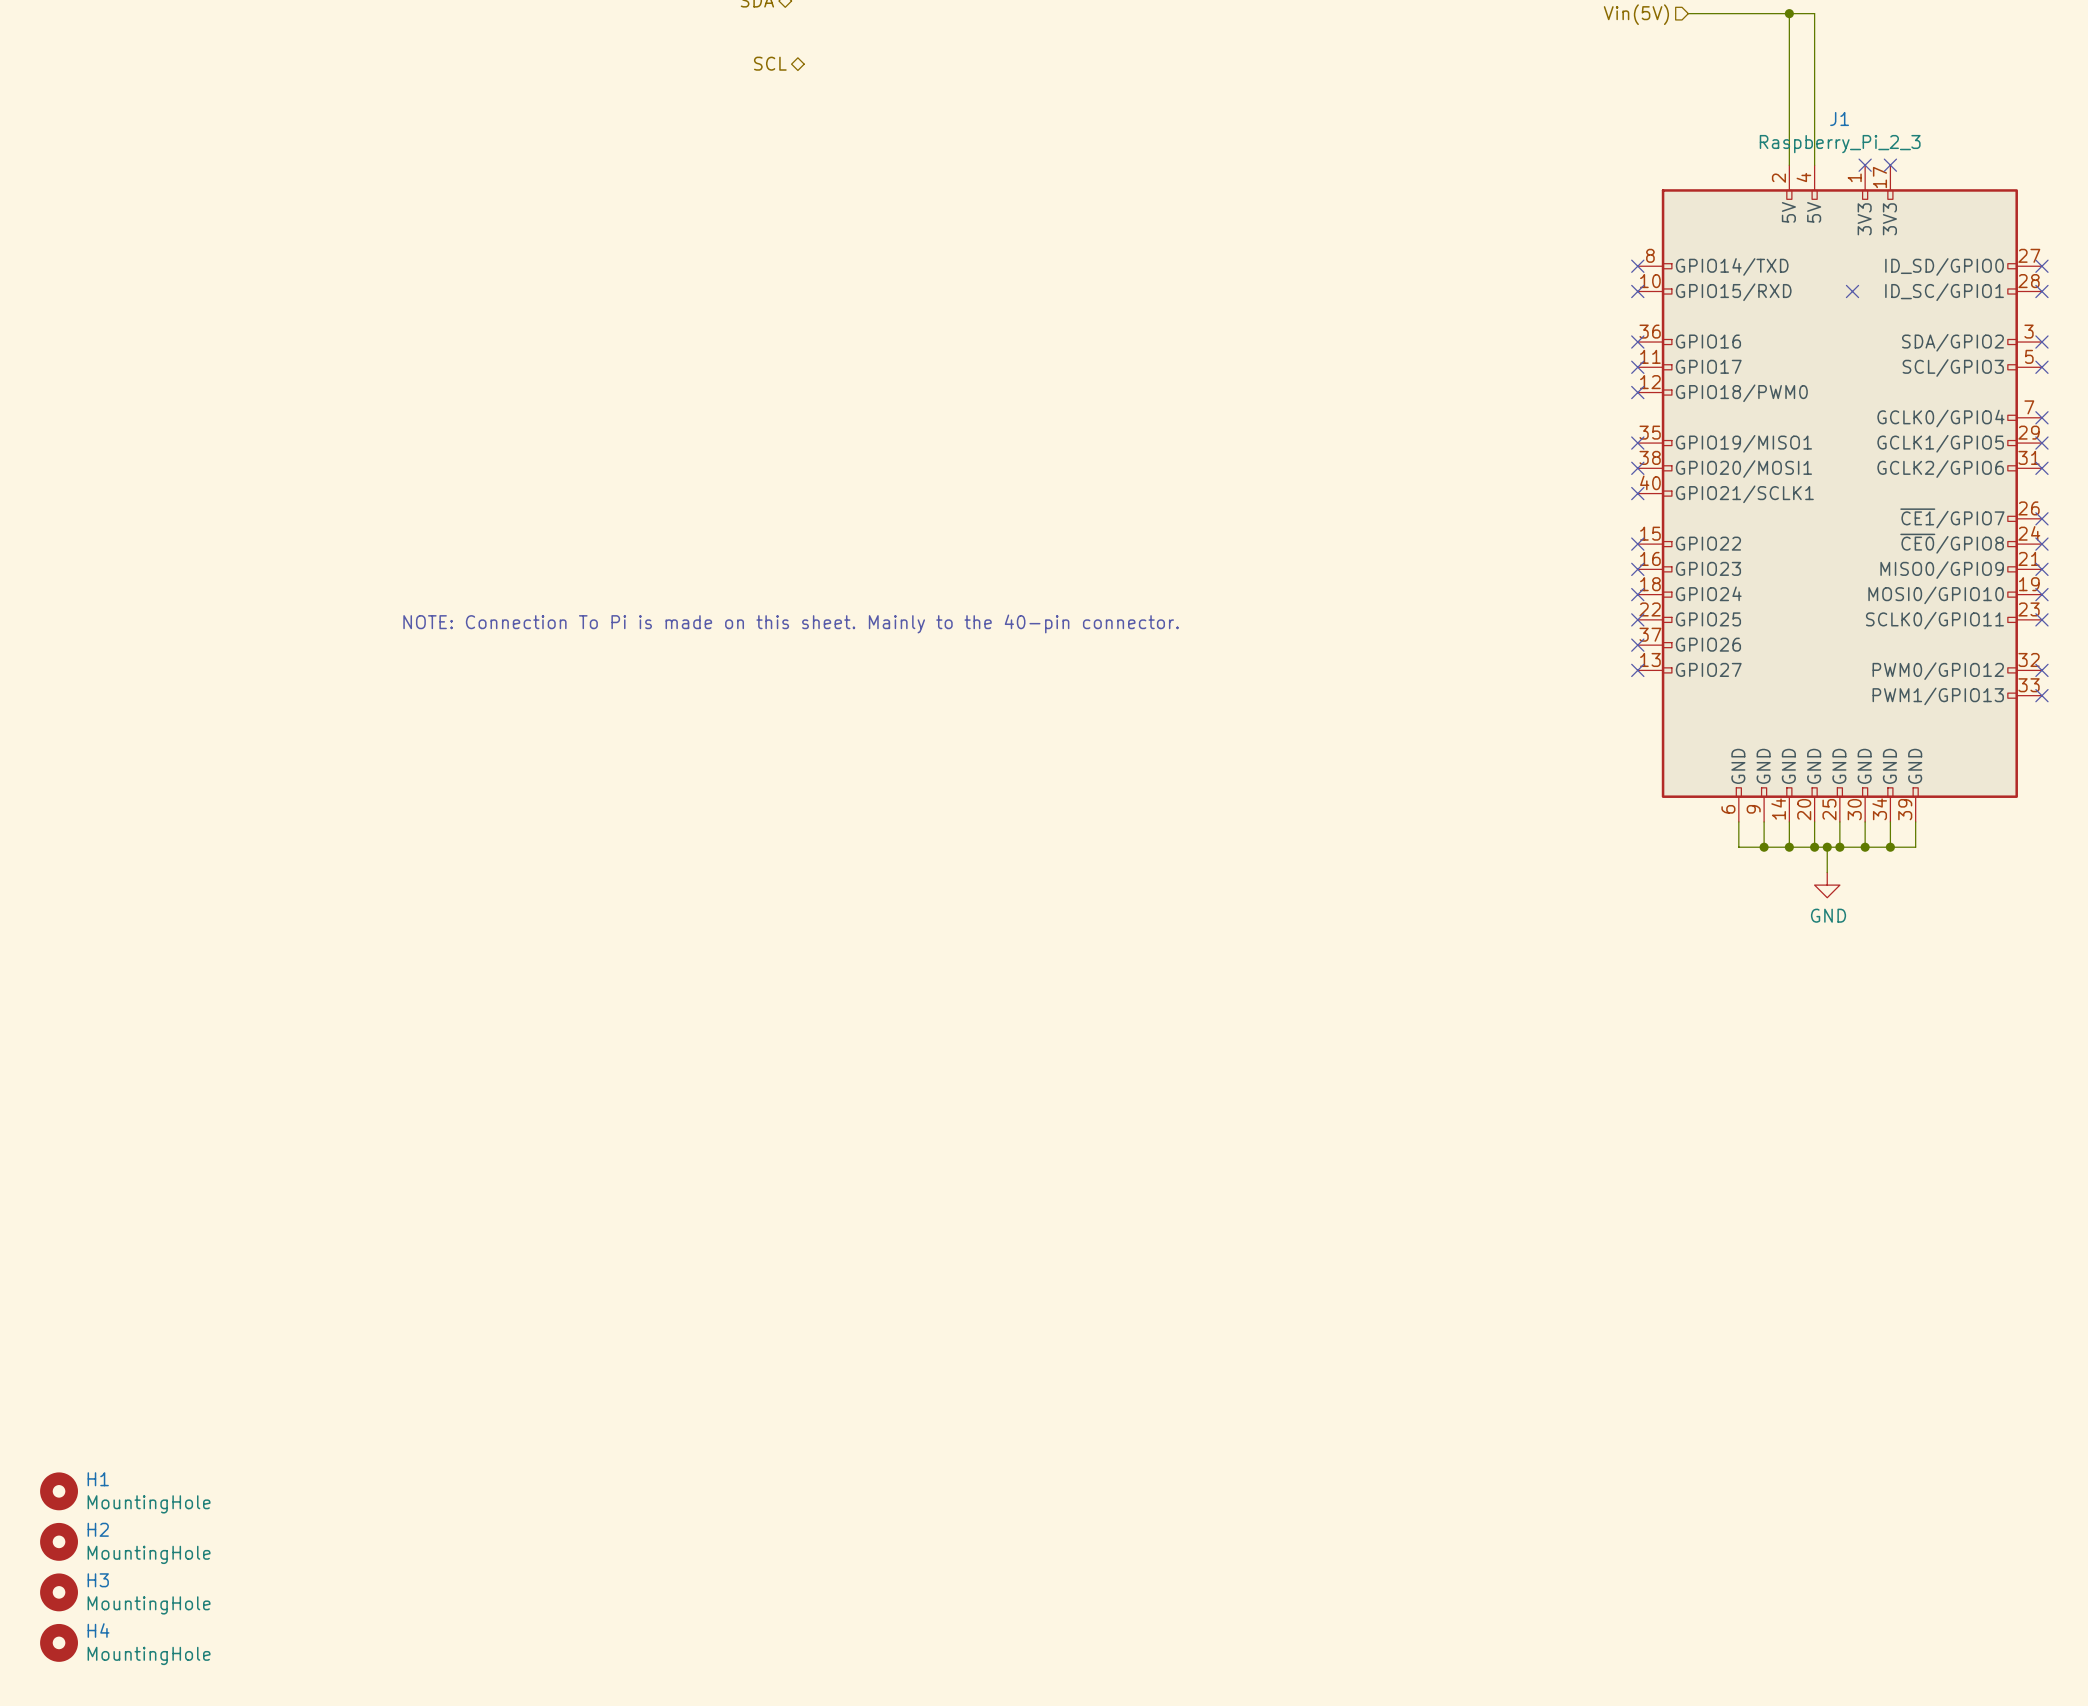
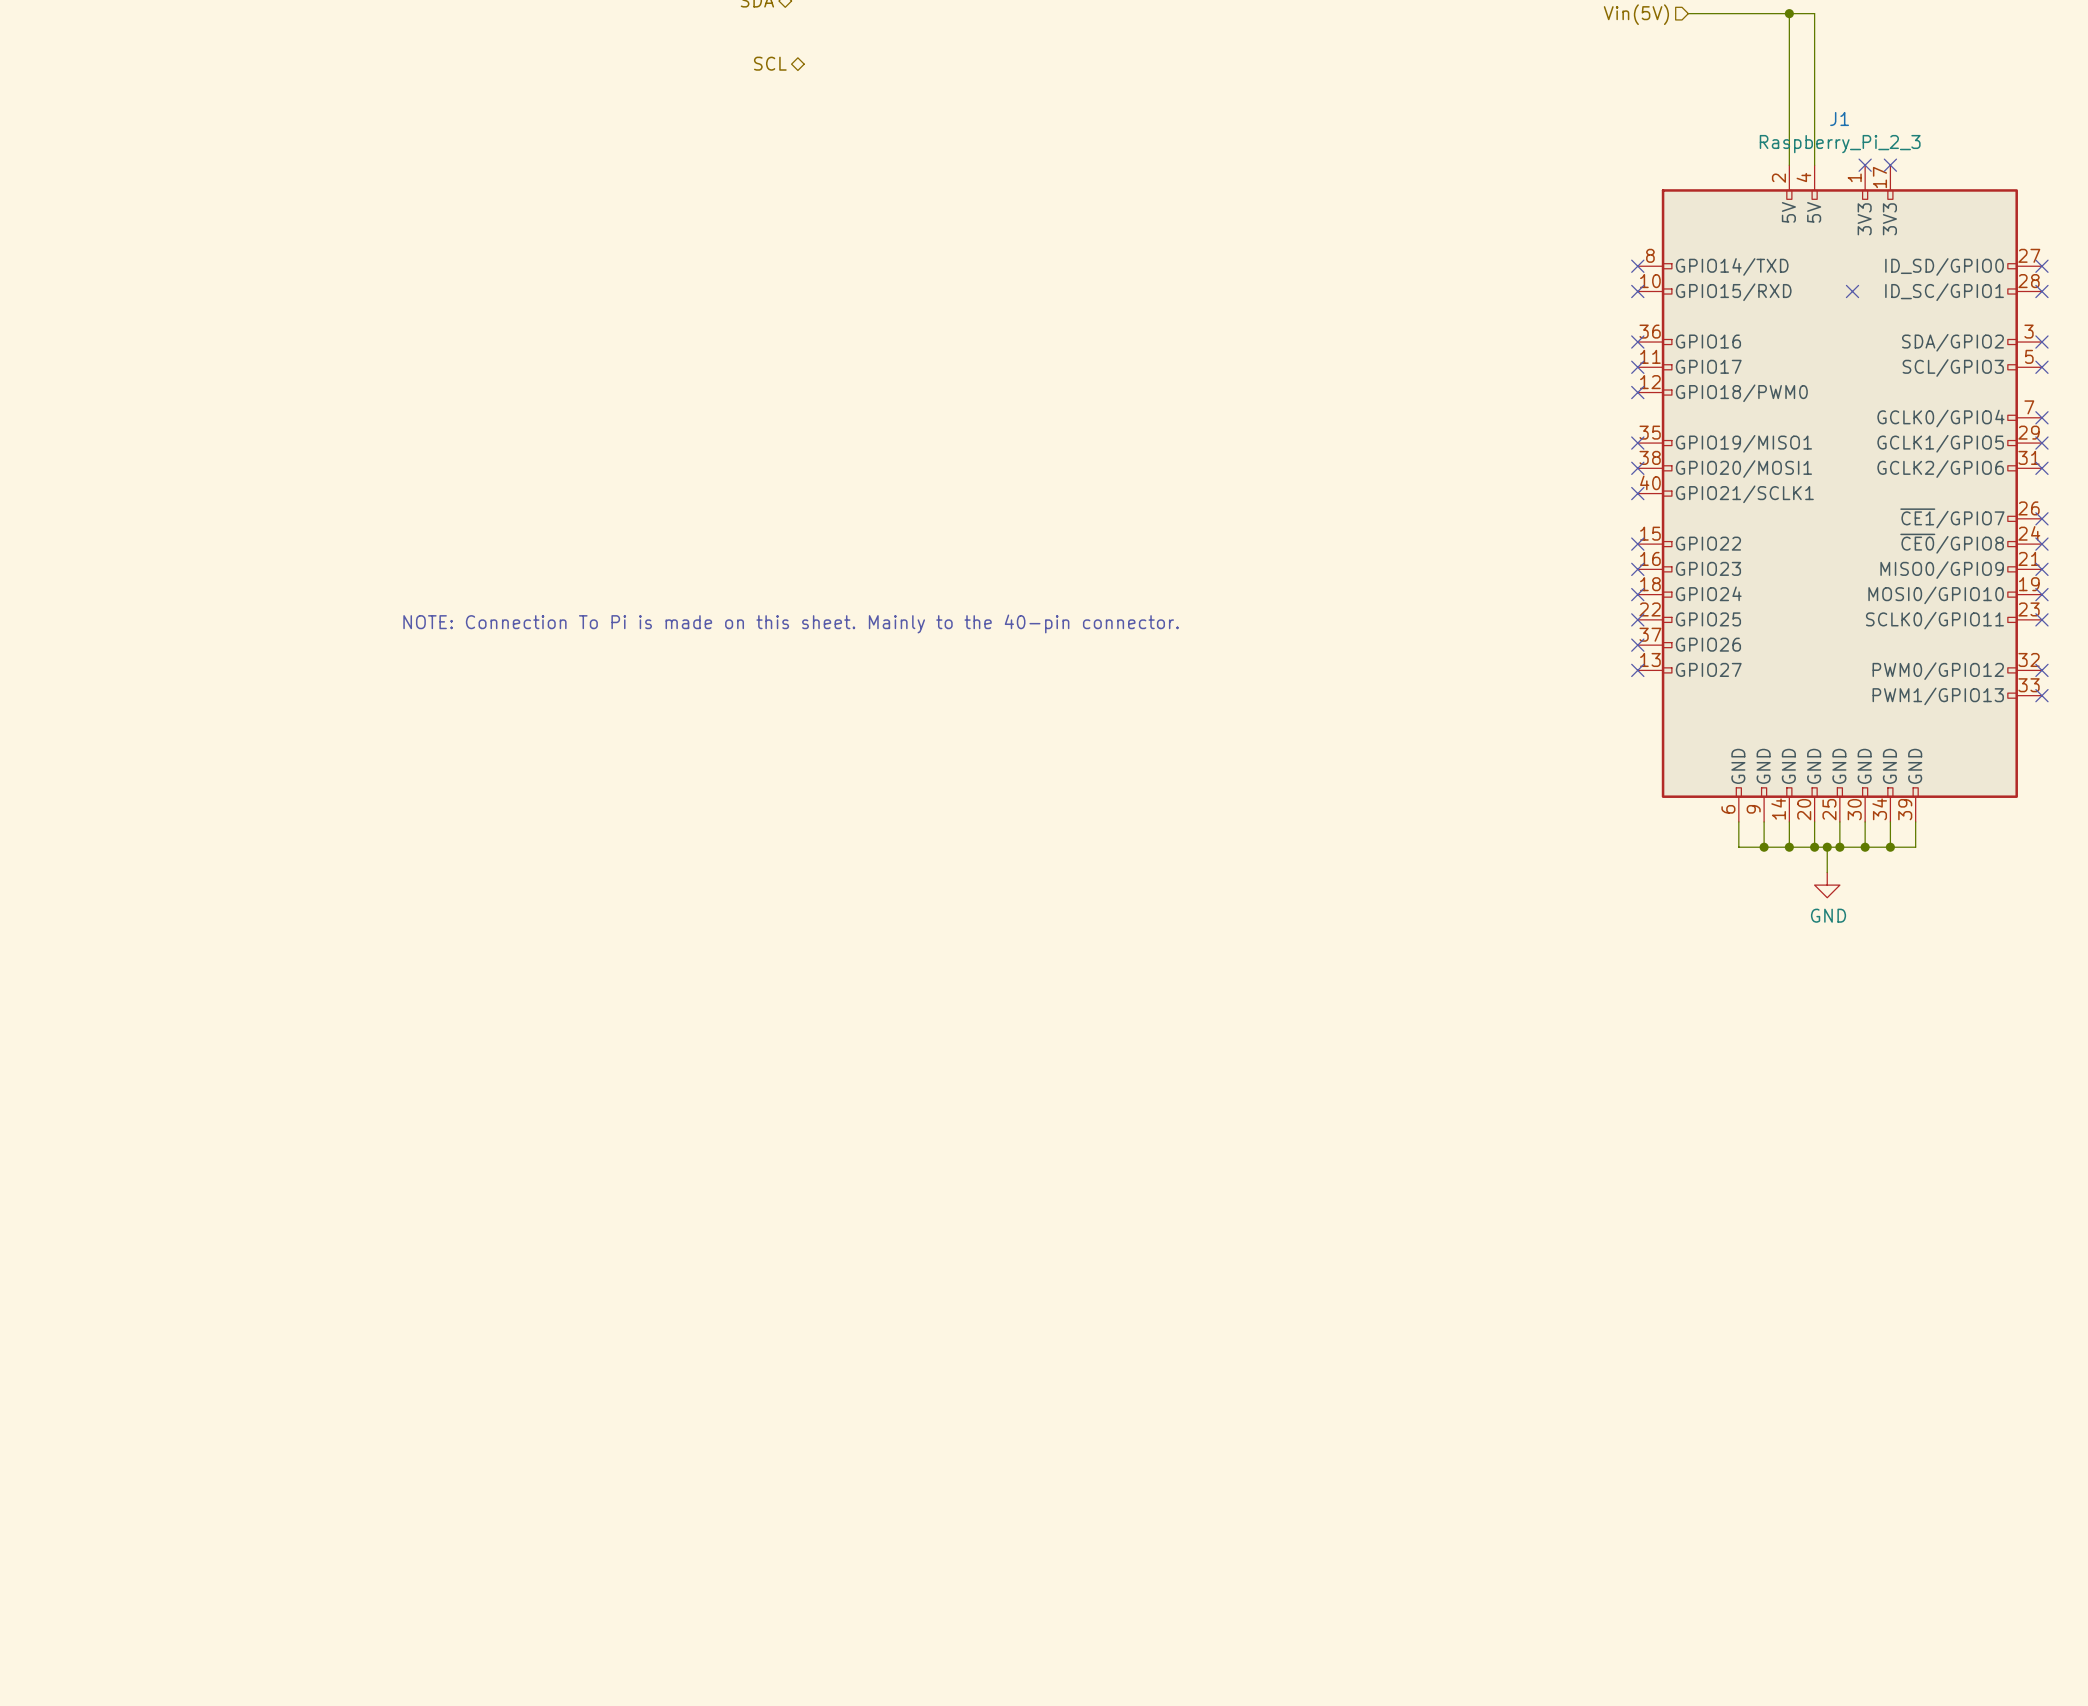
H1: MountingHole (59, 1491) -> none
H2: MountingHole (59, 1541) -> none
H3: MountingHole (59, 1592) -> none
H4: MountingHole (59, 1642) -> none

